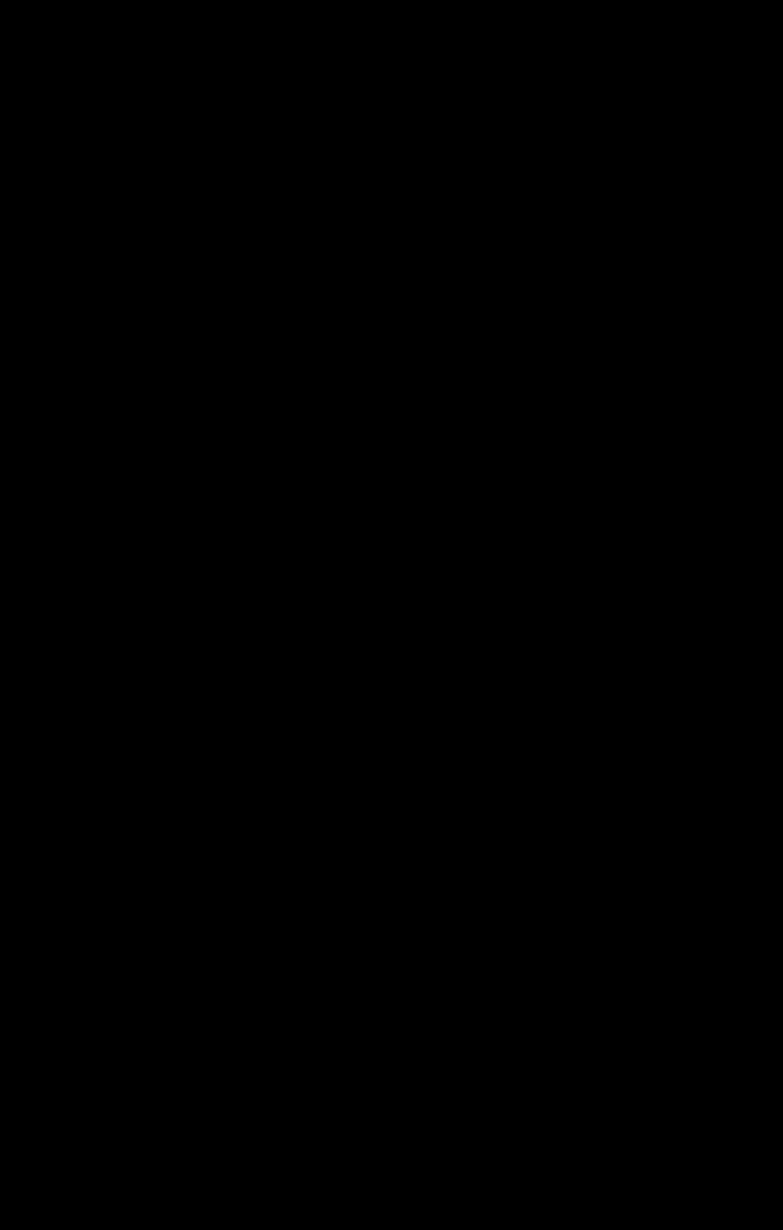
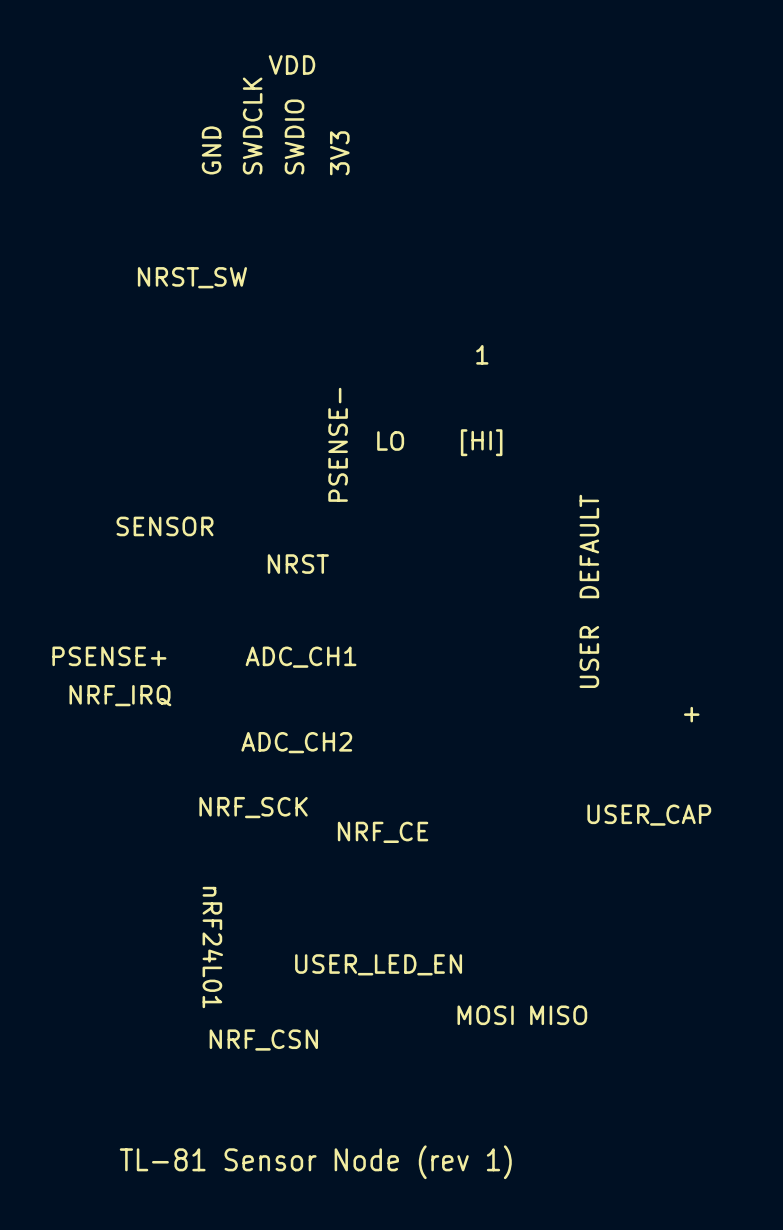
text: none -> VDD (291, 64)
text: none -> SWDCLK (252, 126)
text: none -> SWDIO (294, 136)
text: none -> GND (211, 150)
text: none -> 3V3 (339, 153)
text: none -> NRST_SW (192, 277)
text: none -> 1 (482, 354)
text: none -> LO (390, 440)
text: none -> [HI] (481, 442)
text: none -> PSENSE- (338, 444)
text: none -> SENSOR (165, 526)
text: none -> DEFAULT (589, 546)
text: none -> NRST (298, 564)
text: none -> PSENSE+ (109, 656)
text: none -> USER (589, 656)
text: none -> ADC_CH1 (301, 657)
text: none -> NRF_IRQ (120, 695)
text: none -> + (691, 714)
text: none -> ADC_CH2 (296, 742)
text: none -> NRF_SCK (253, 807)
text: none -> USER_CAP (649, 815)
text: none -> NRF_CE (383, 832)
text: none -> nRF24L01 (212, 947)
text: none -> USER_LED_EN (378, 964)
text: none -> MOSI (485, 1015)
text: none -> MISO (558, 1015)
text: none -> NRF_CSN (263, 1040)
text: none -> TL-81 Sensor Node (rev 1) (315, 1162)

